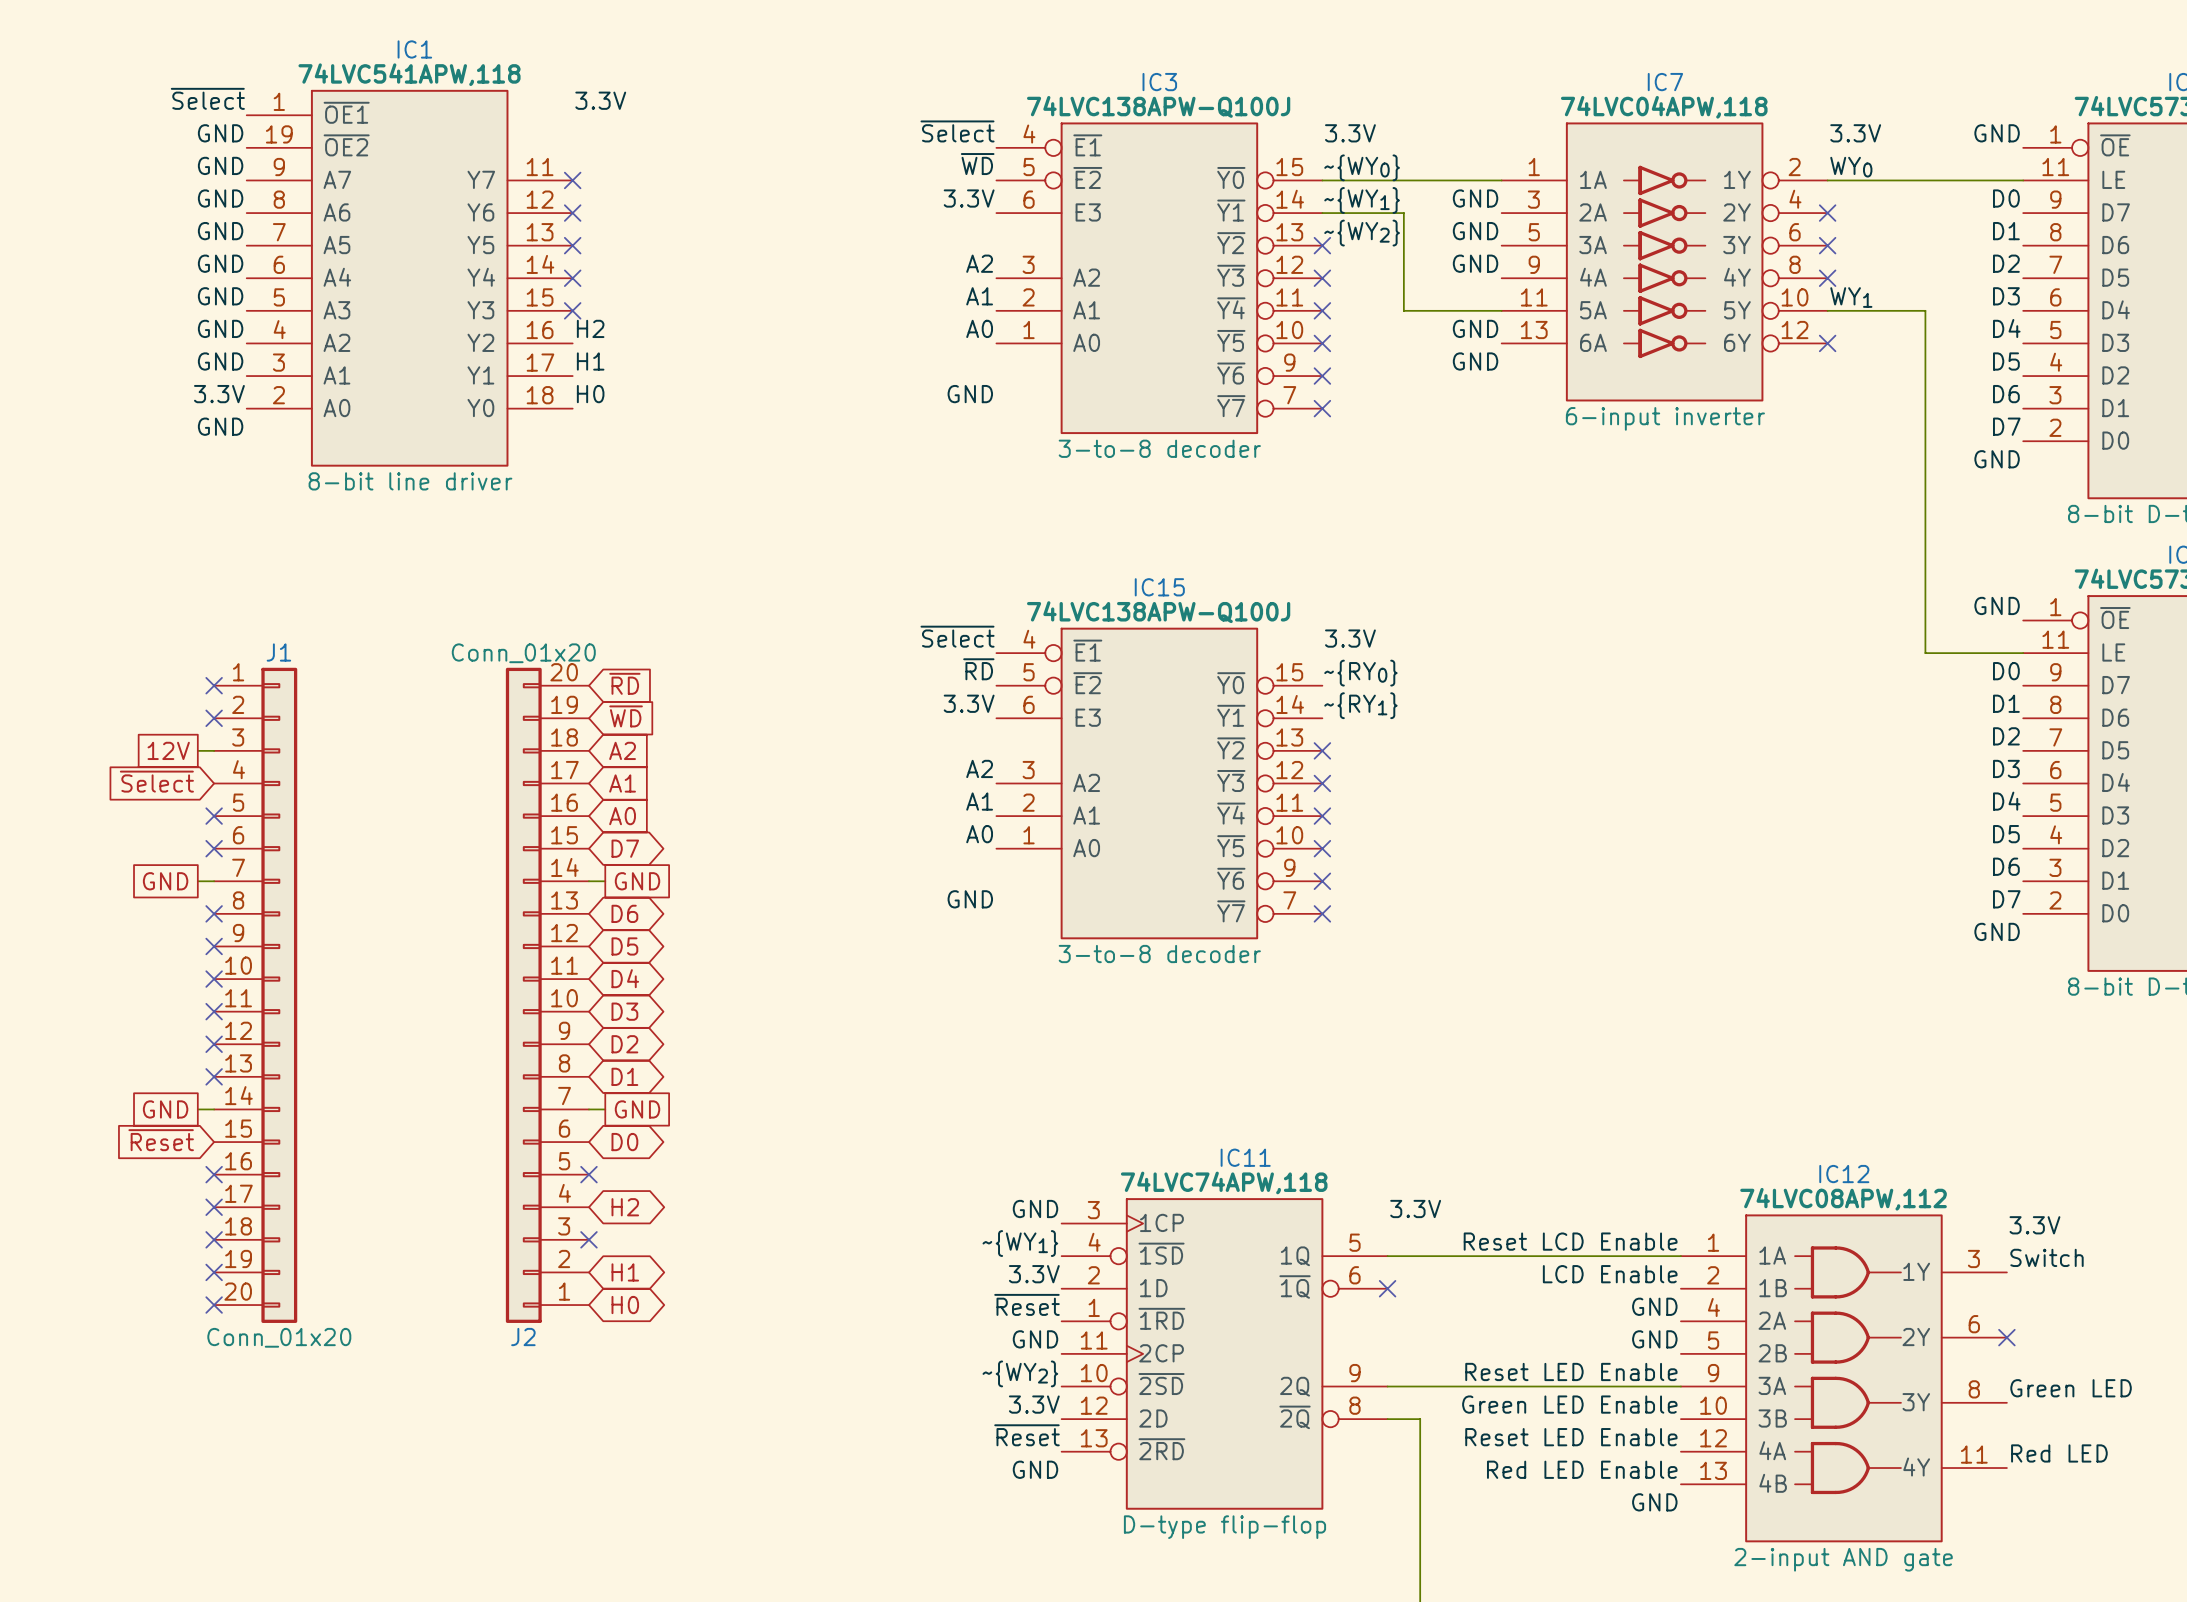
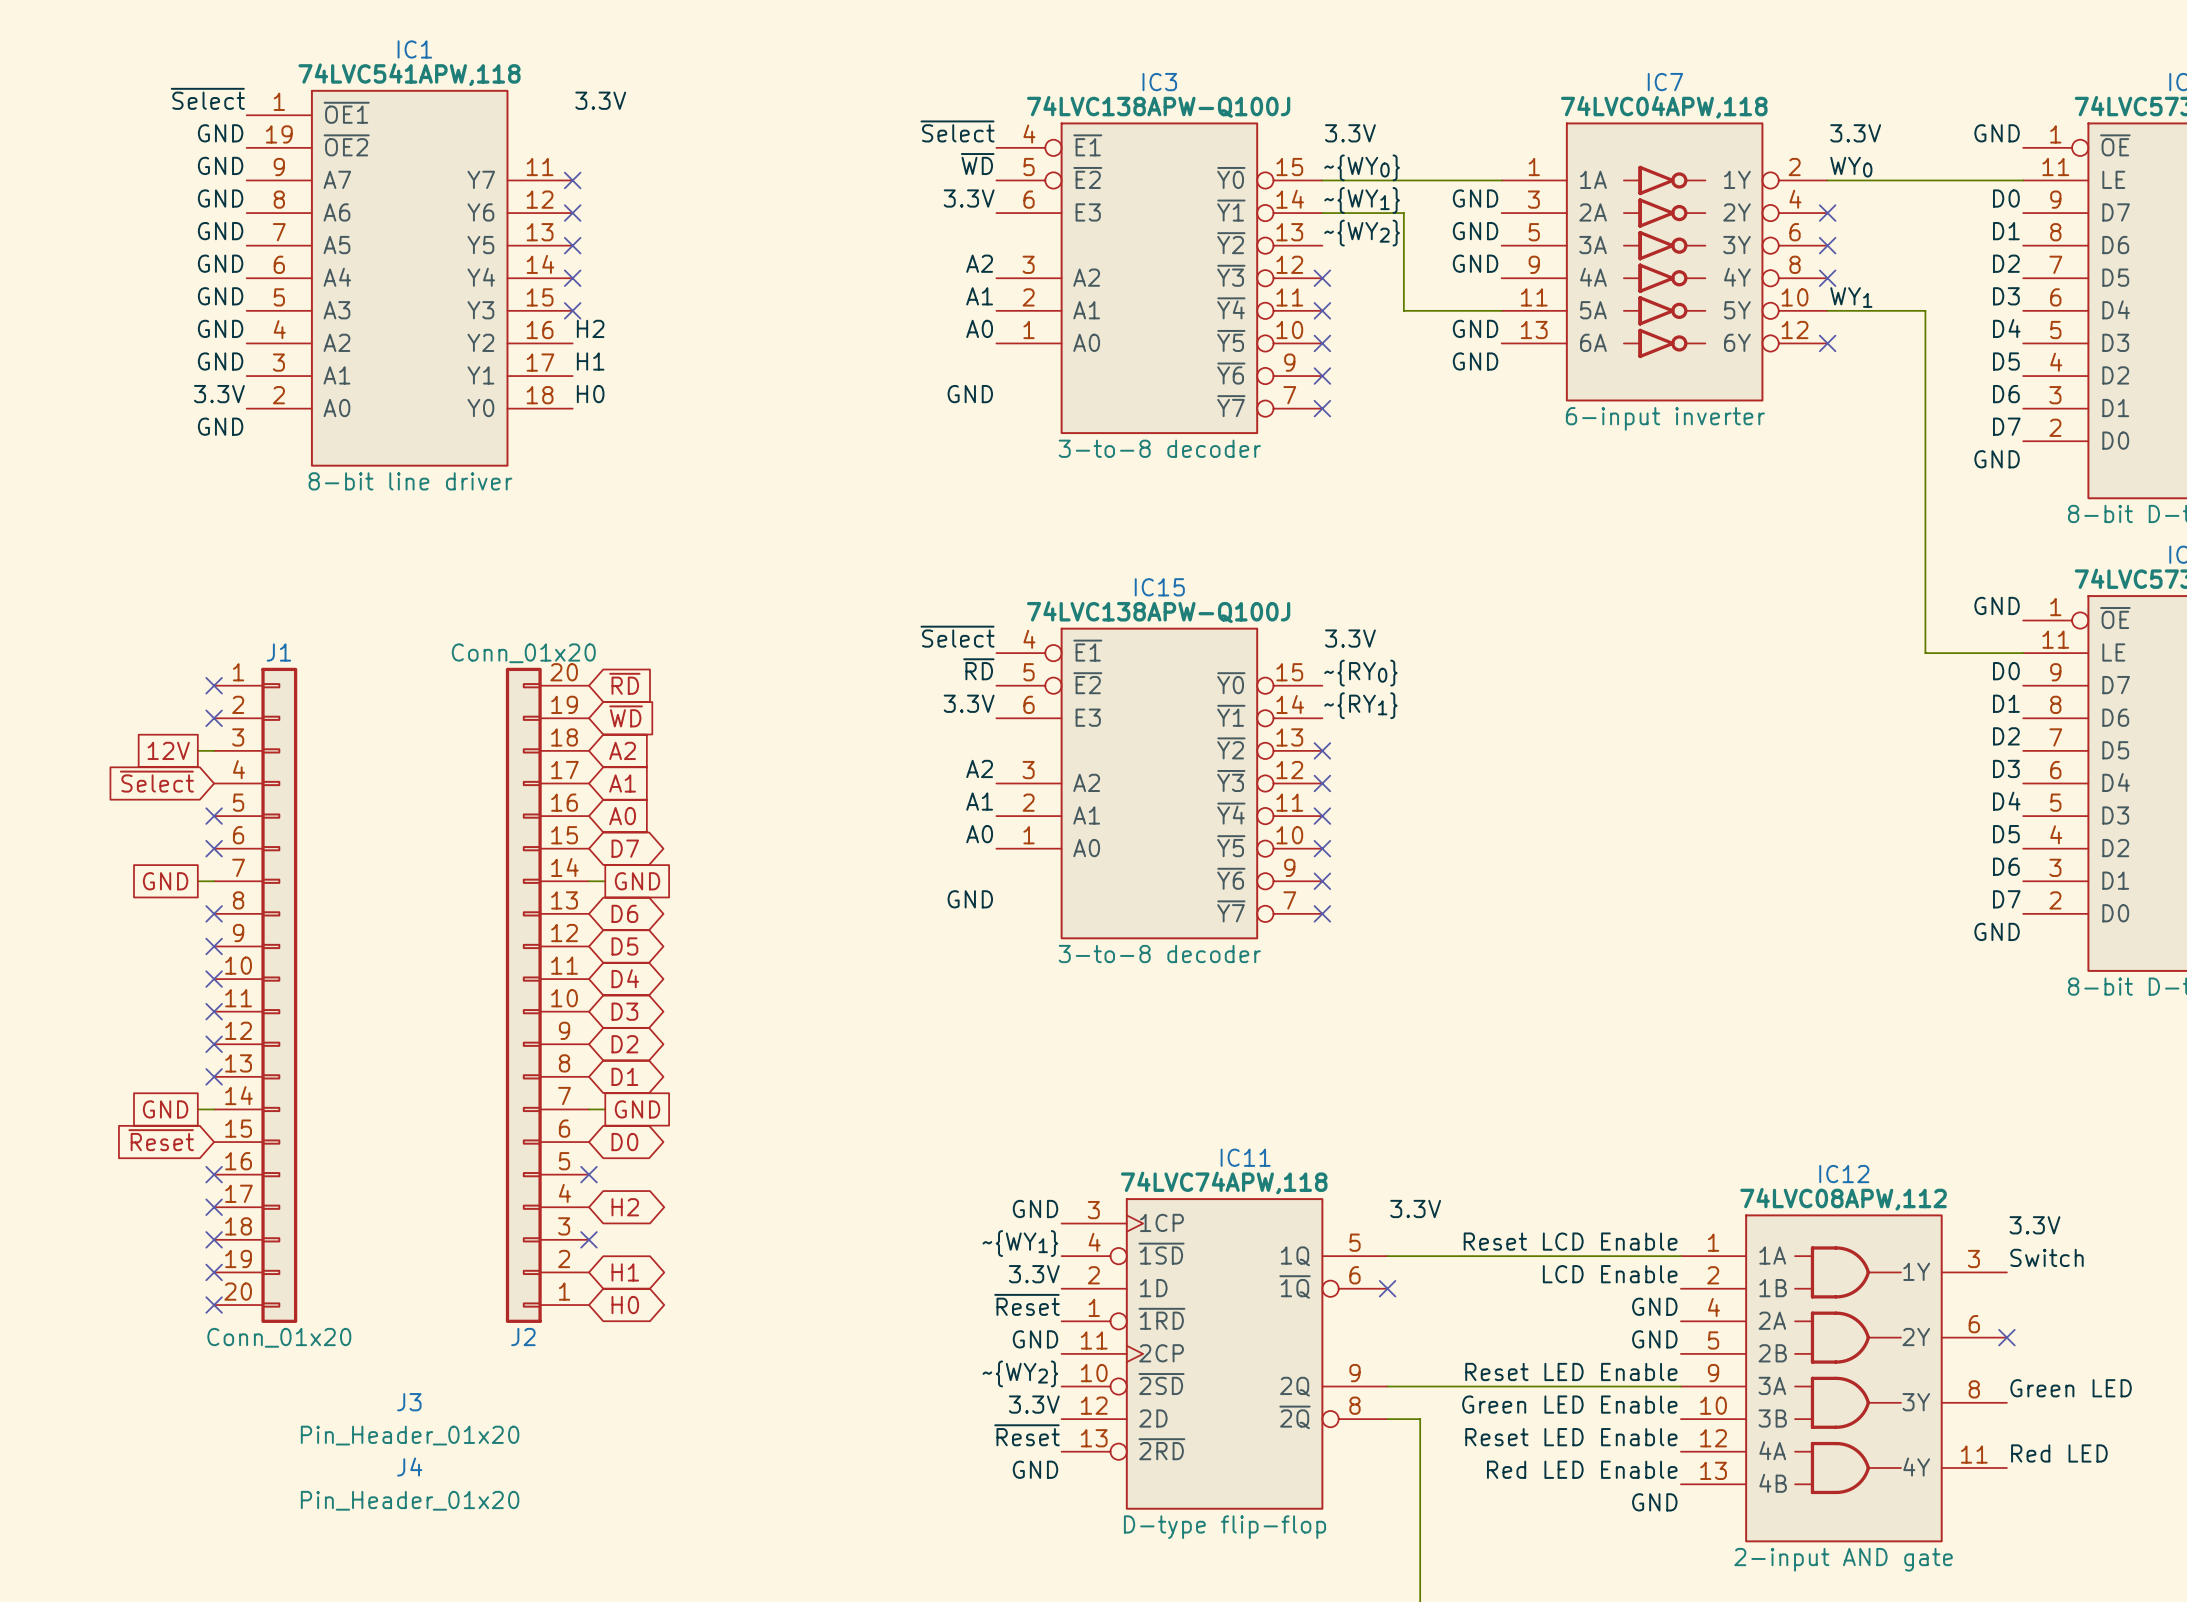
no-connect mark: (1322, 245) -> none
J3: none -> Pin_Header_01x20 (410, 1419)
J4: none -> Pin_Header_01x20 (410, 1484)

